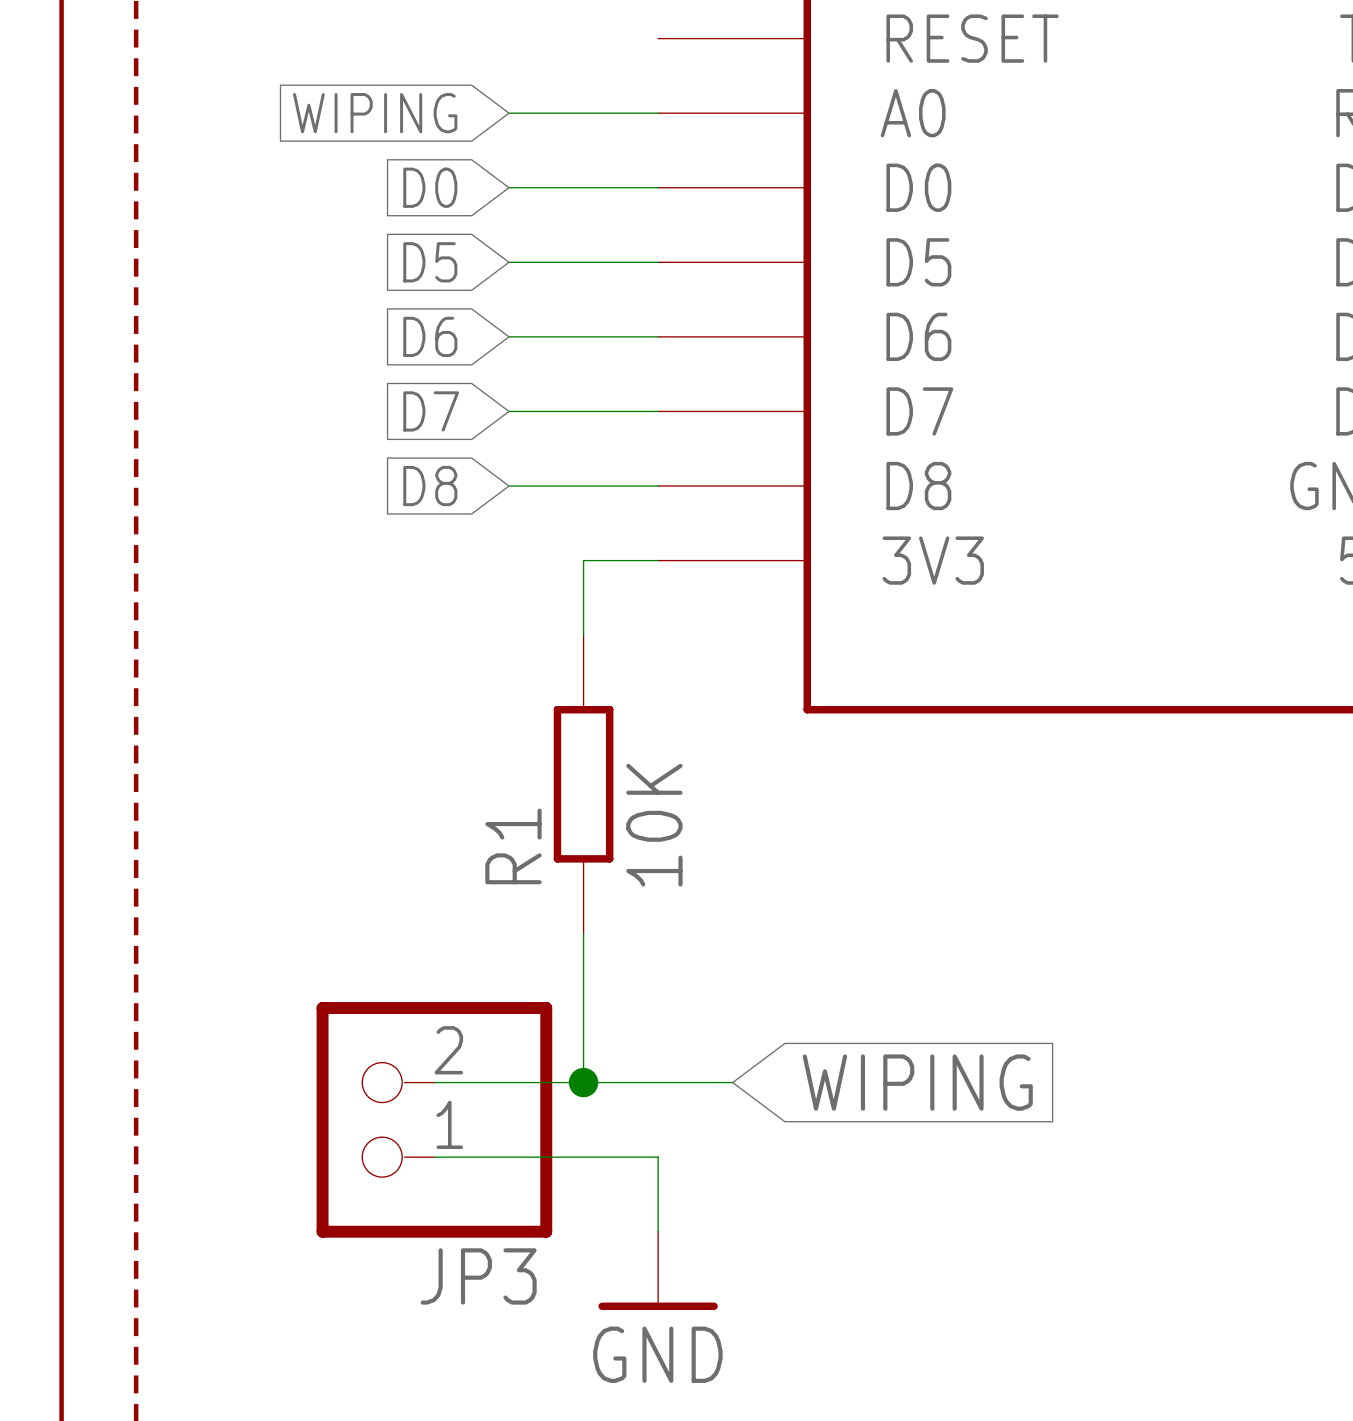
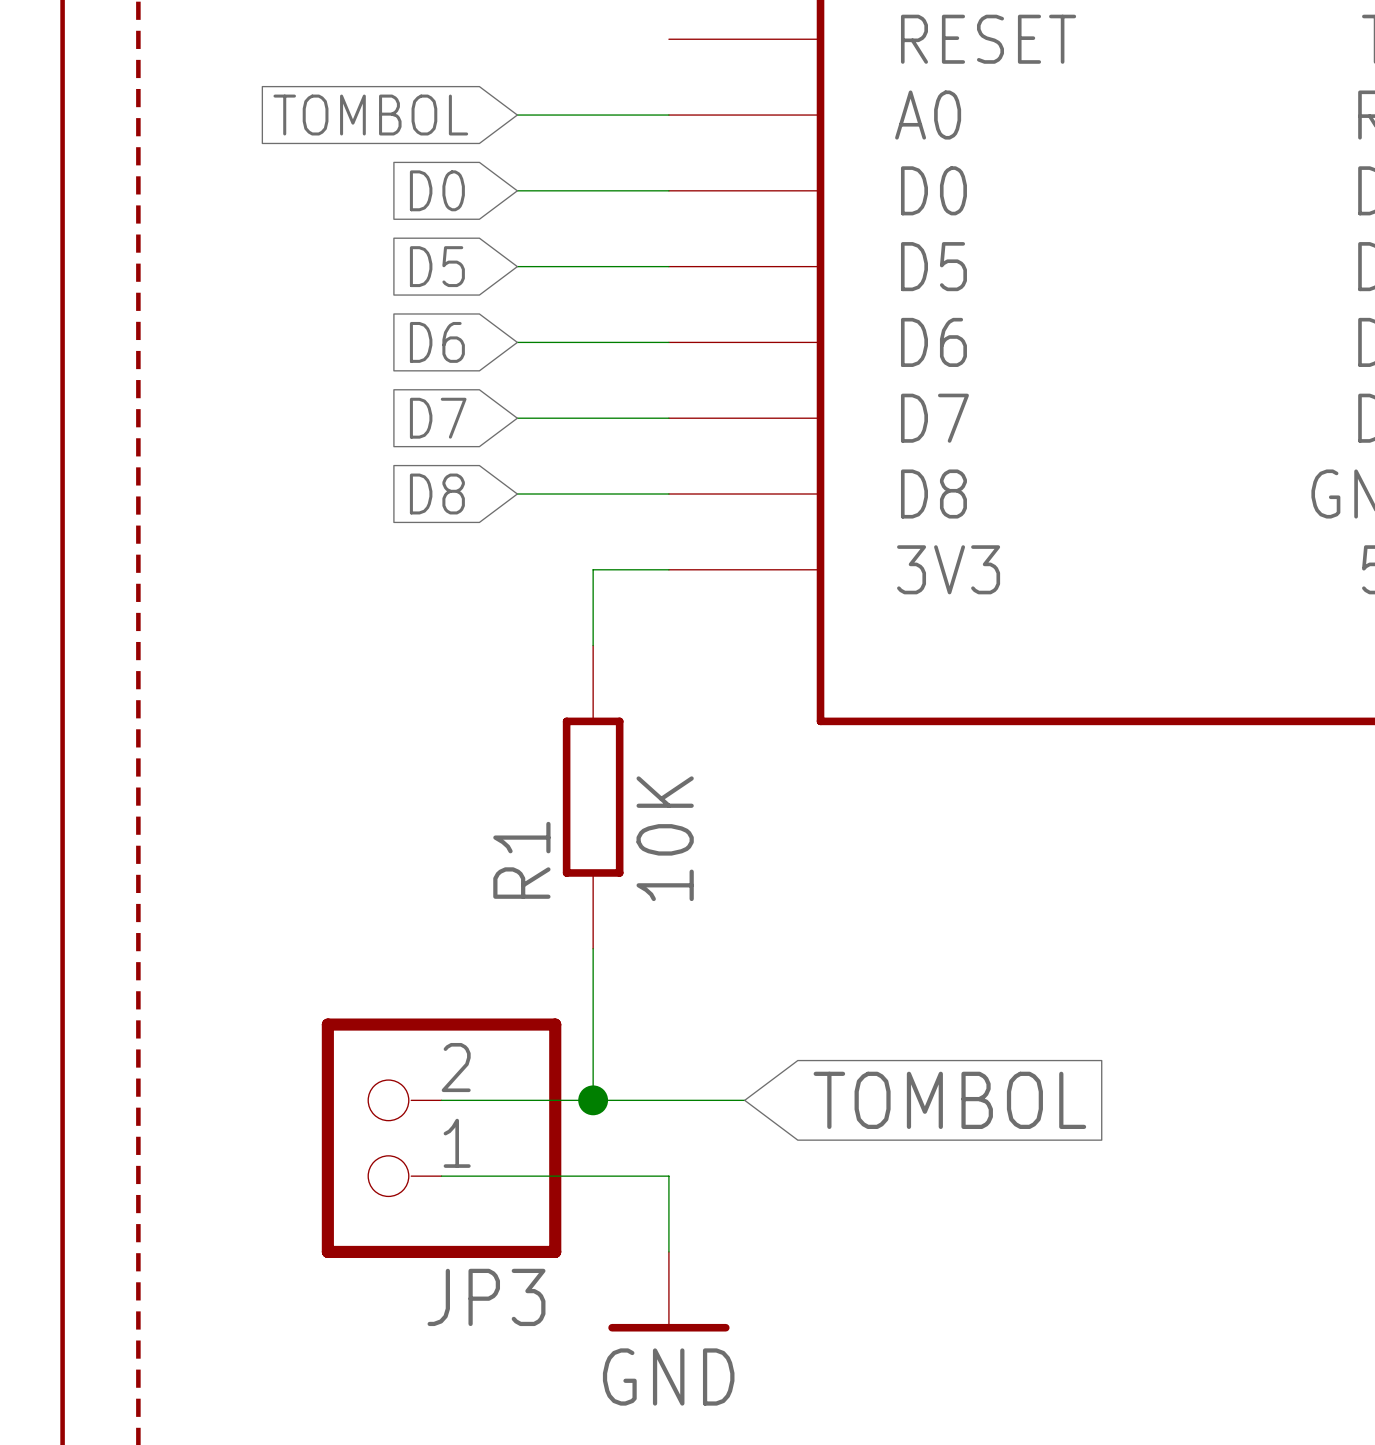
global label: WIPING (375, 113) -> TOMBOL (370, 115)
global label: WIPING (917, 1082) -> TOMBOL (949, 1100)

